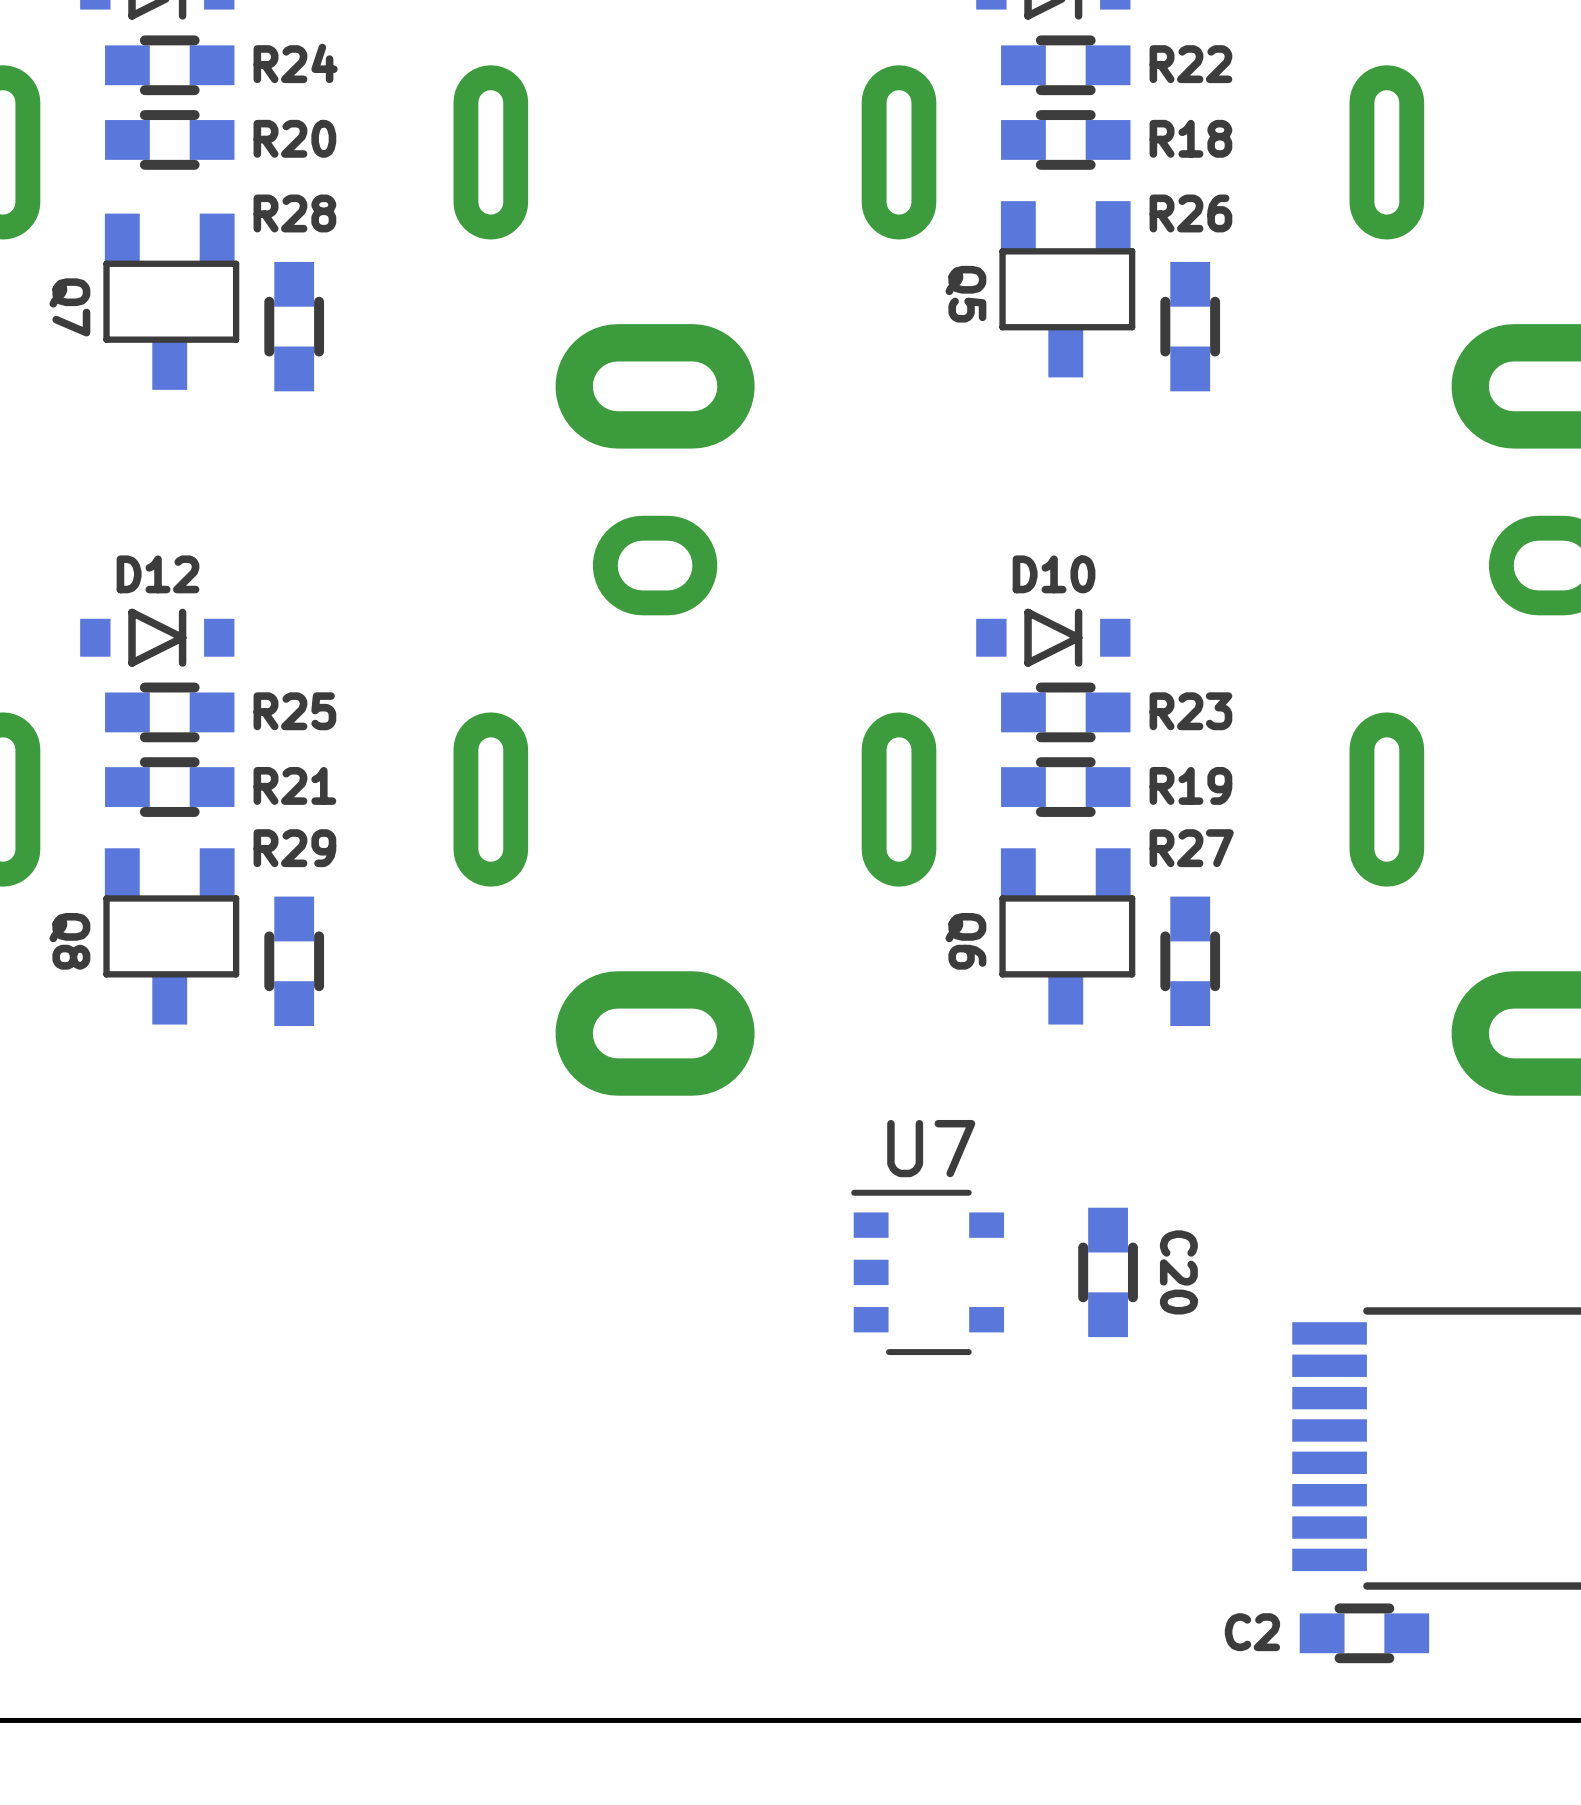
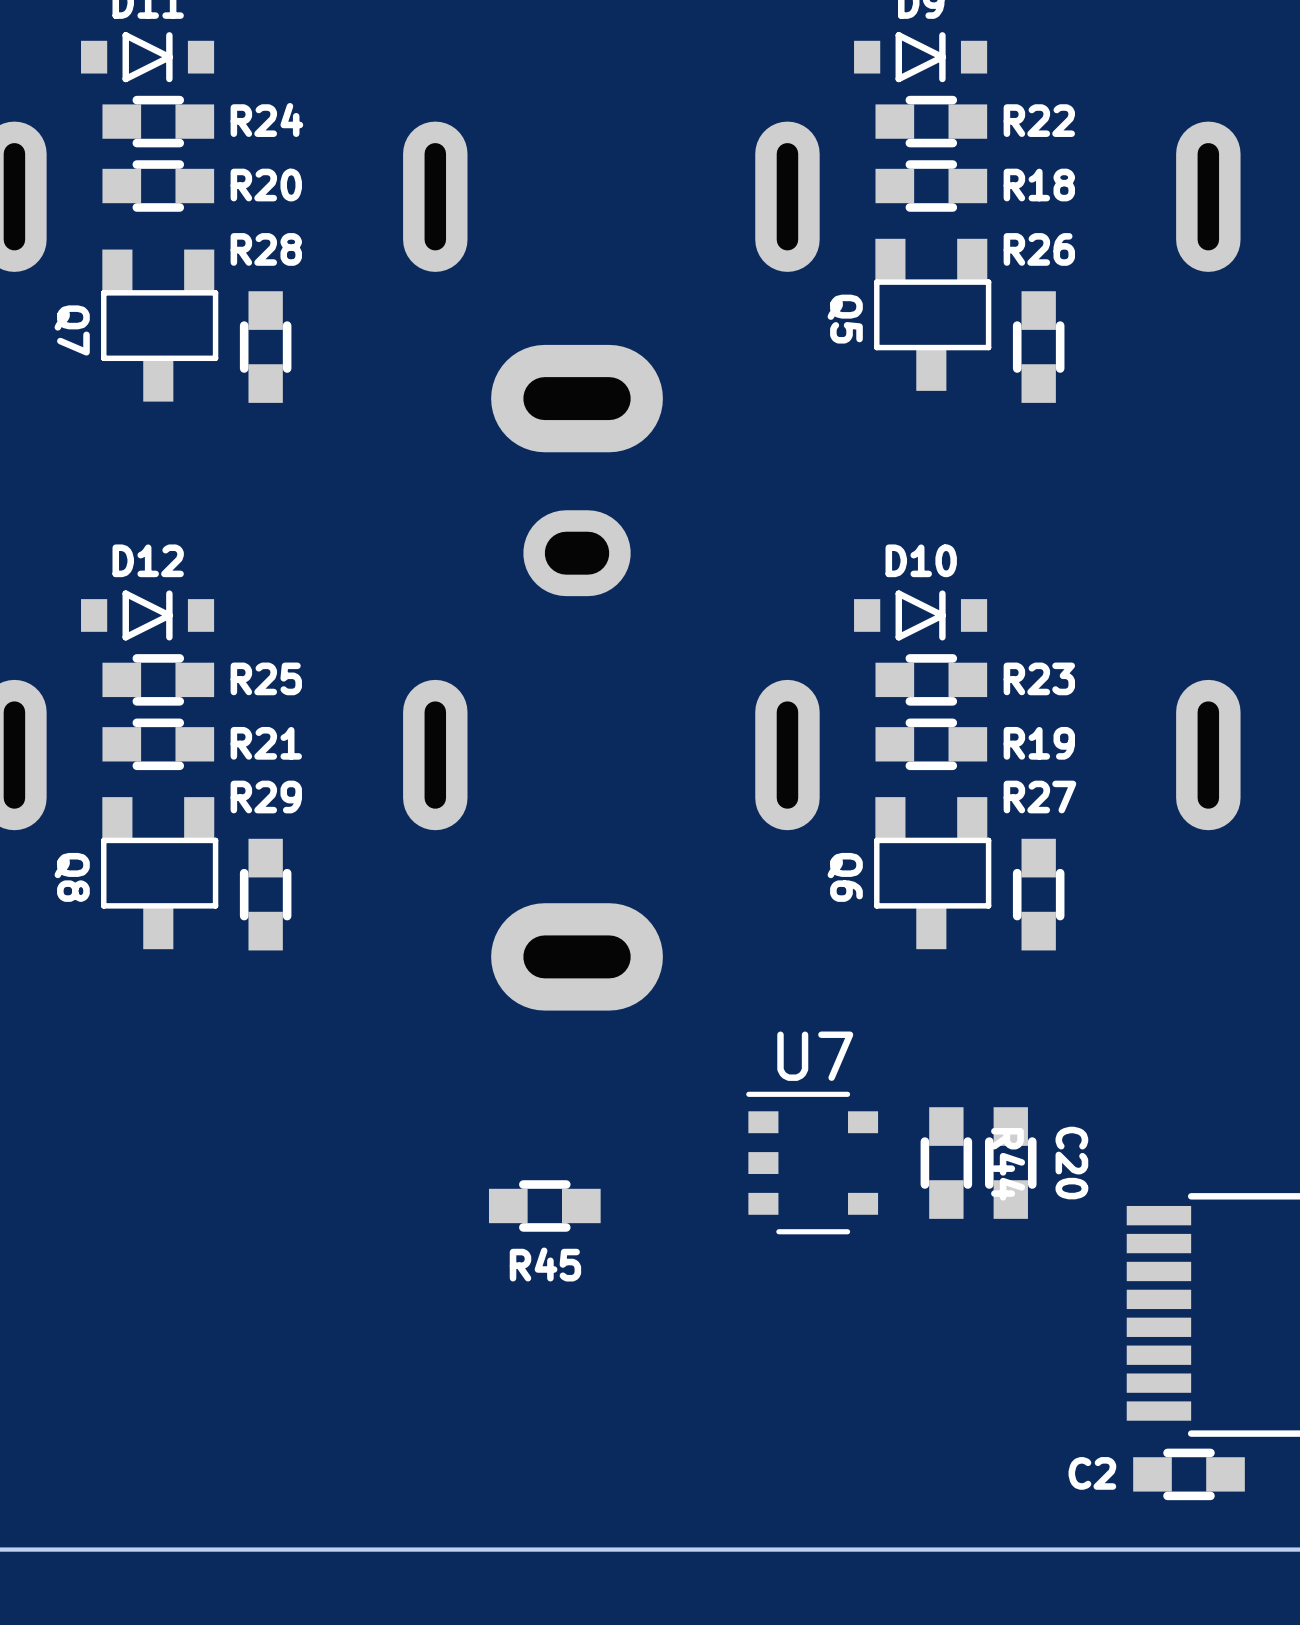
part: none -> (946, 1163)
C20 position: (1108, 1272) -> (1010, 1163)
R45: none -> (544, 1205)

